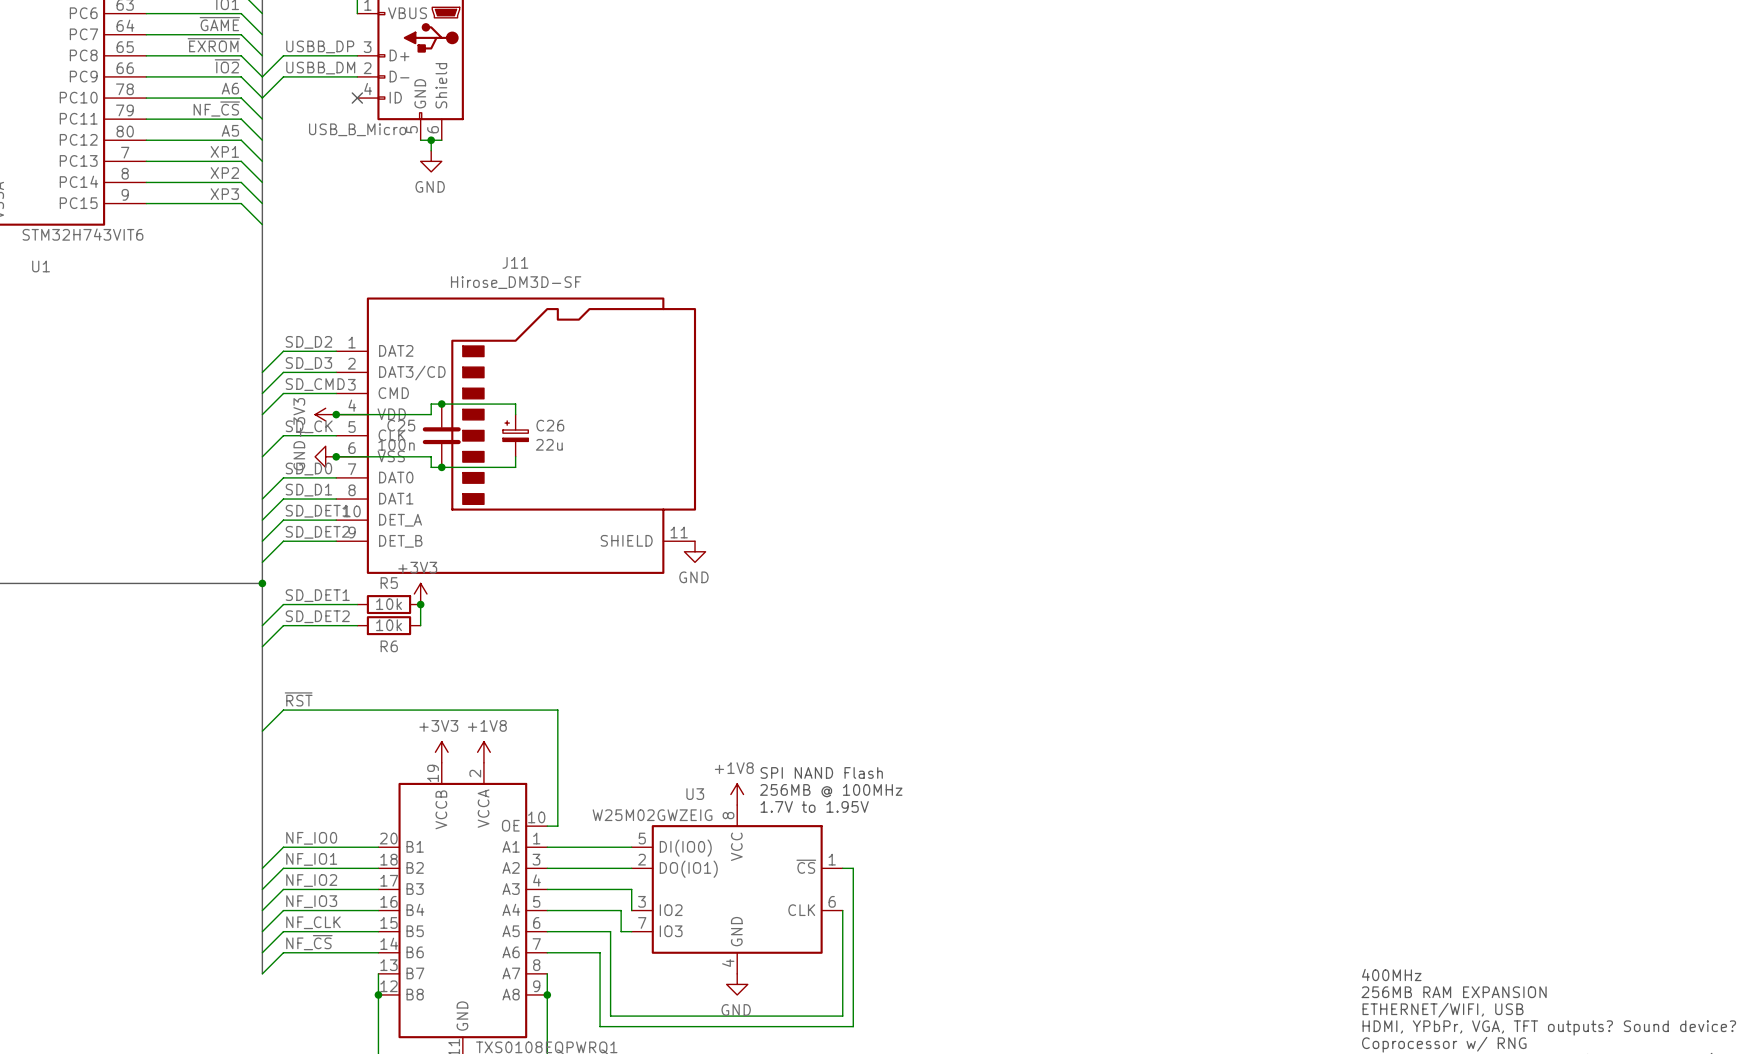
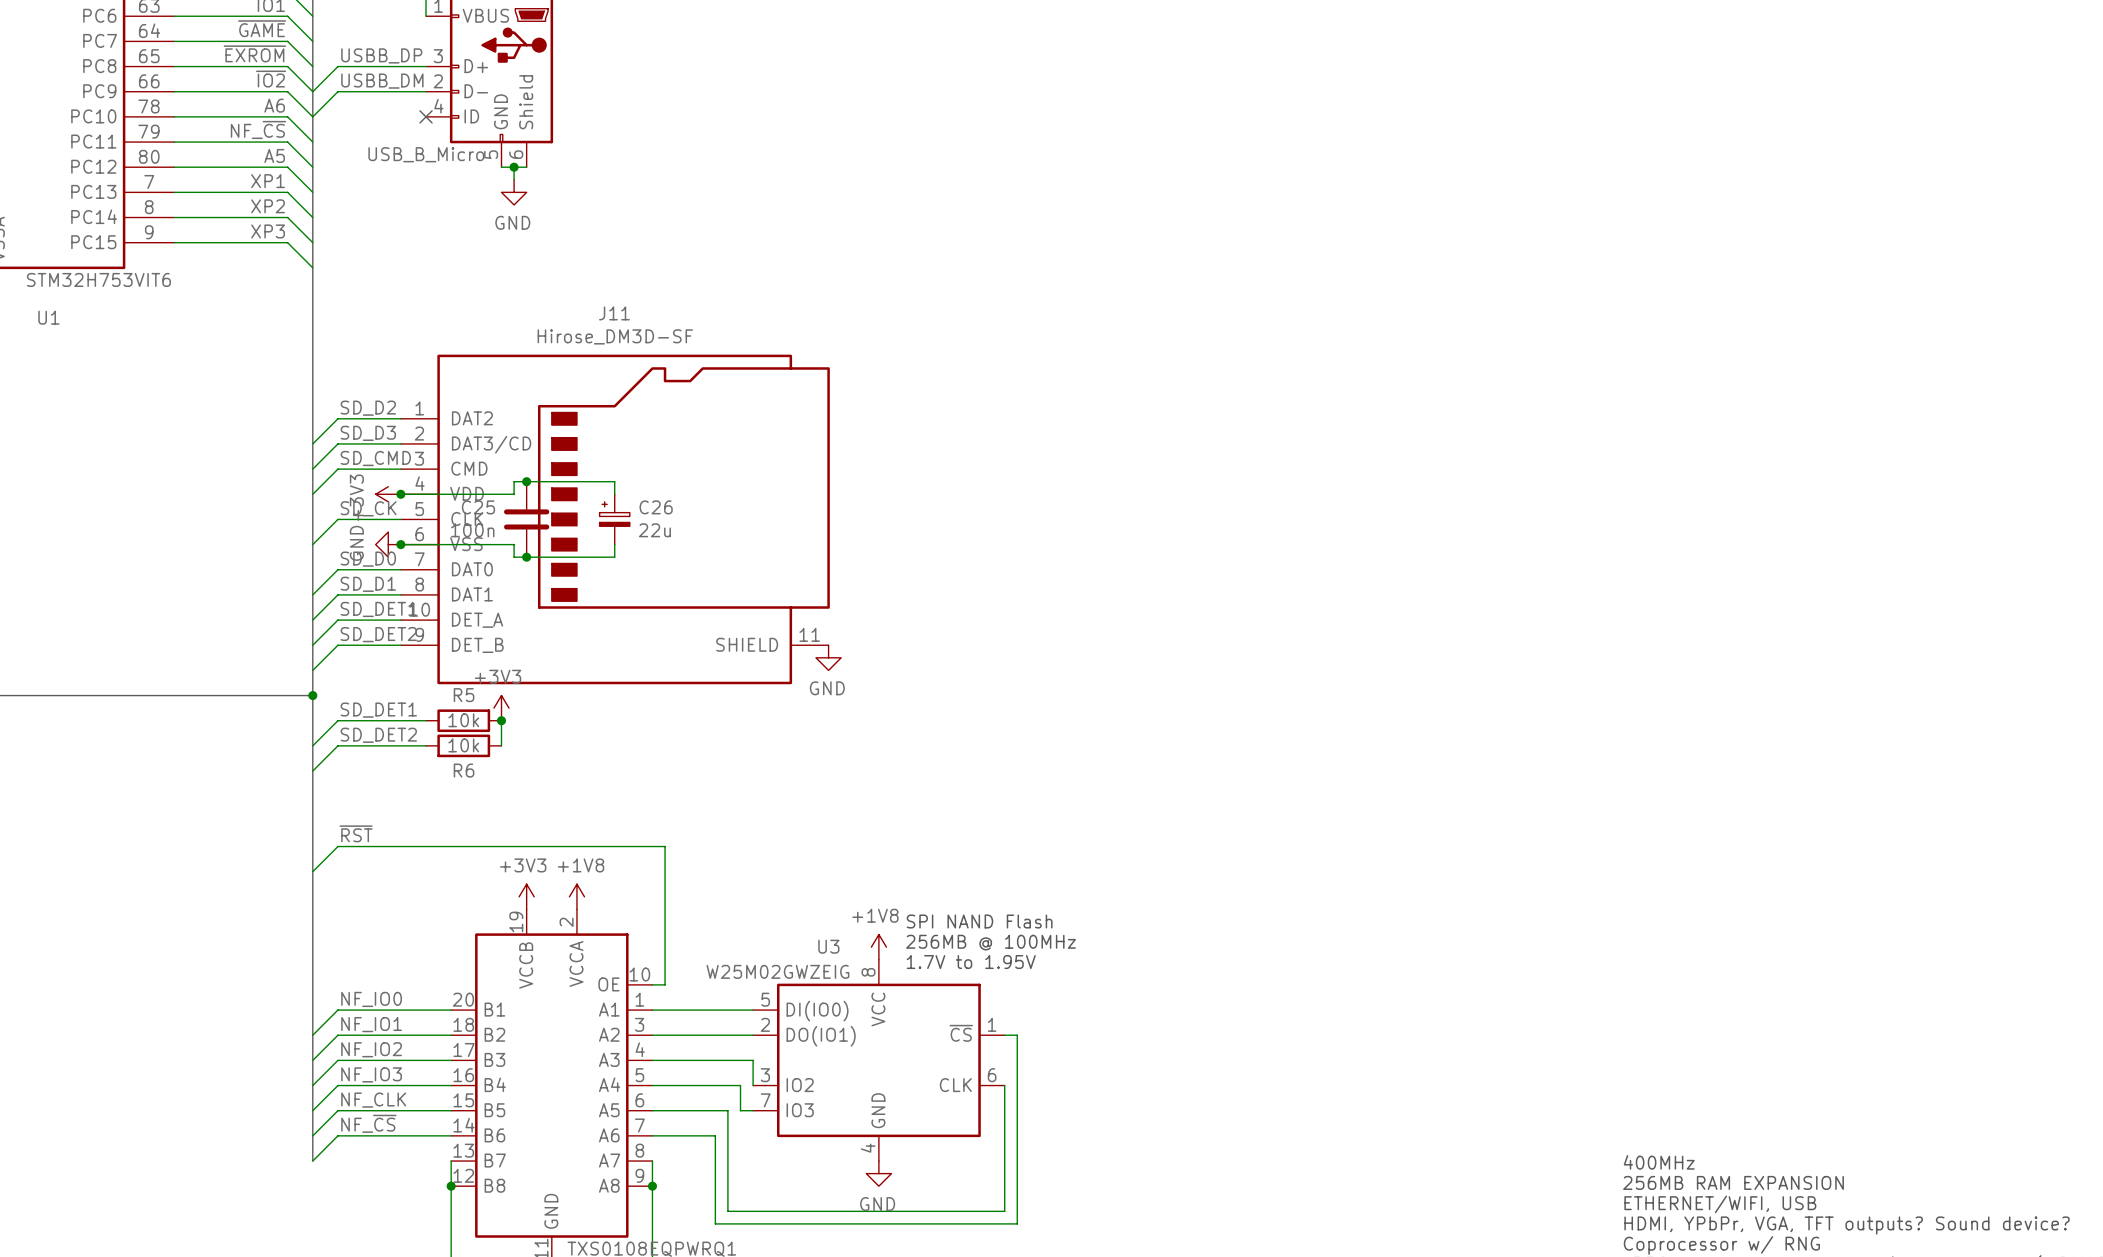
U1 value: STM32H743VIT6 (82, 234) -> STM32H753VIT6 (98, 279)

